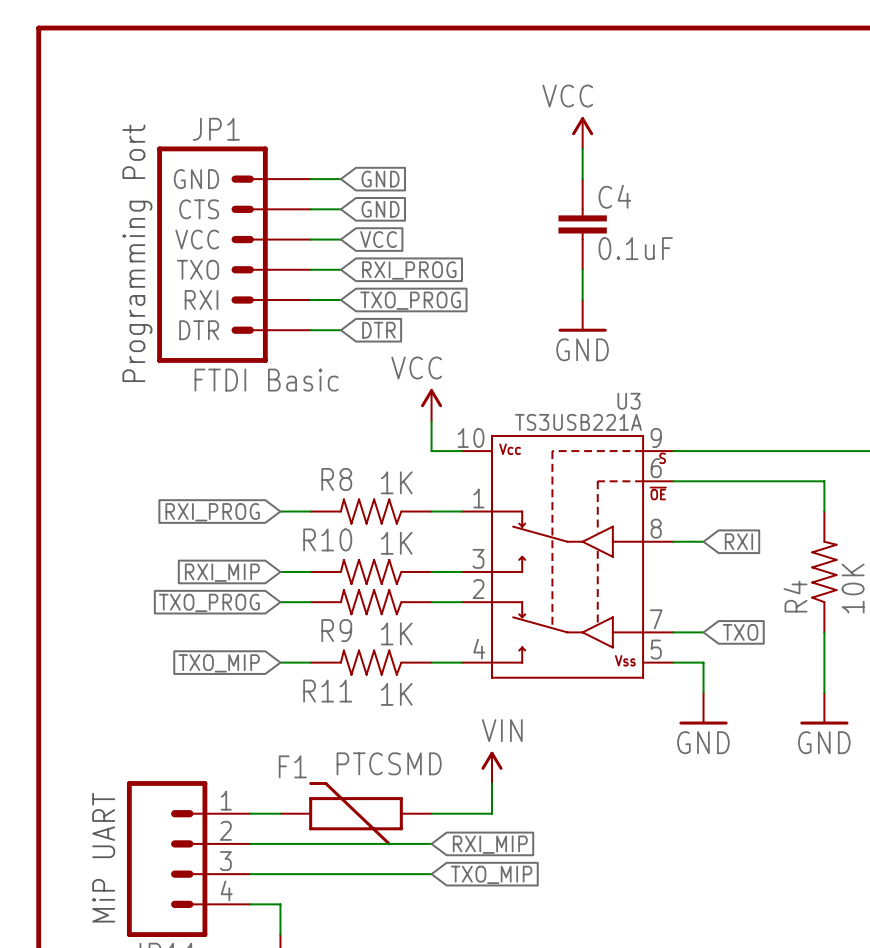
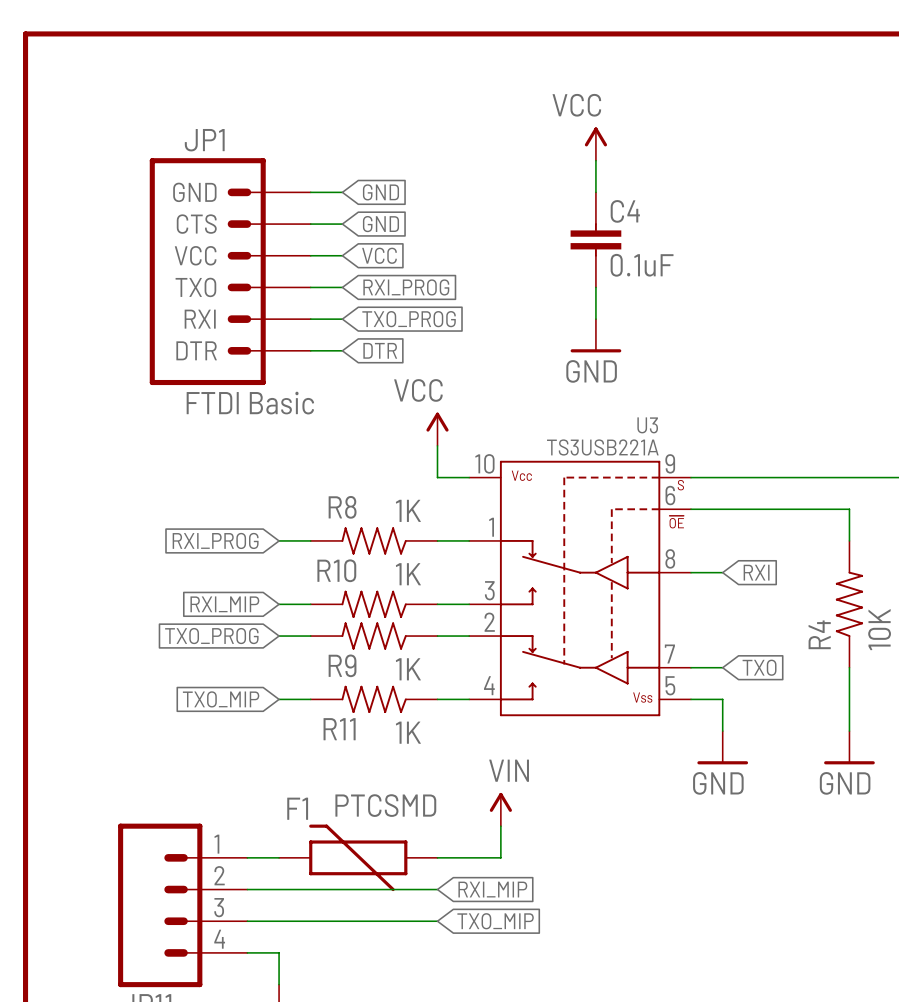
text: Programming Port (137, 253) -> none
text: MiP UART (103, 857) -> none

